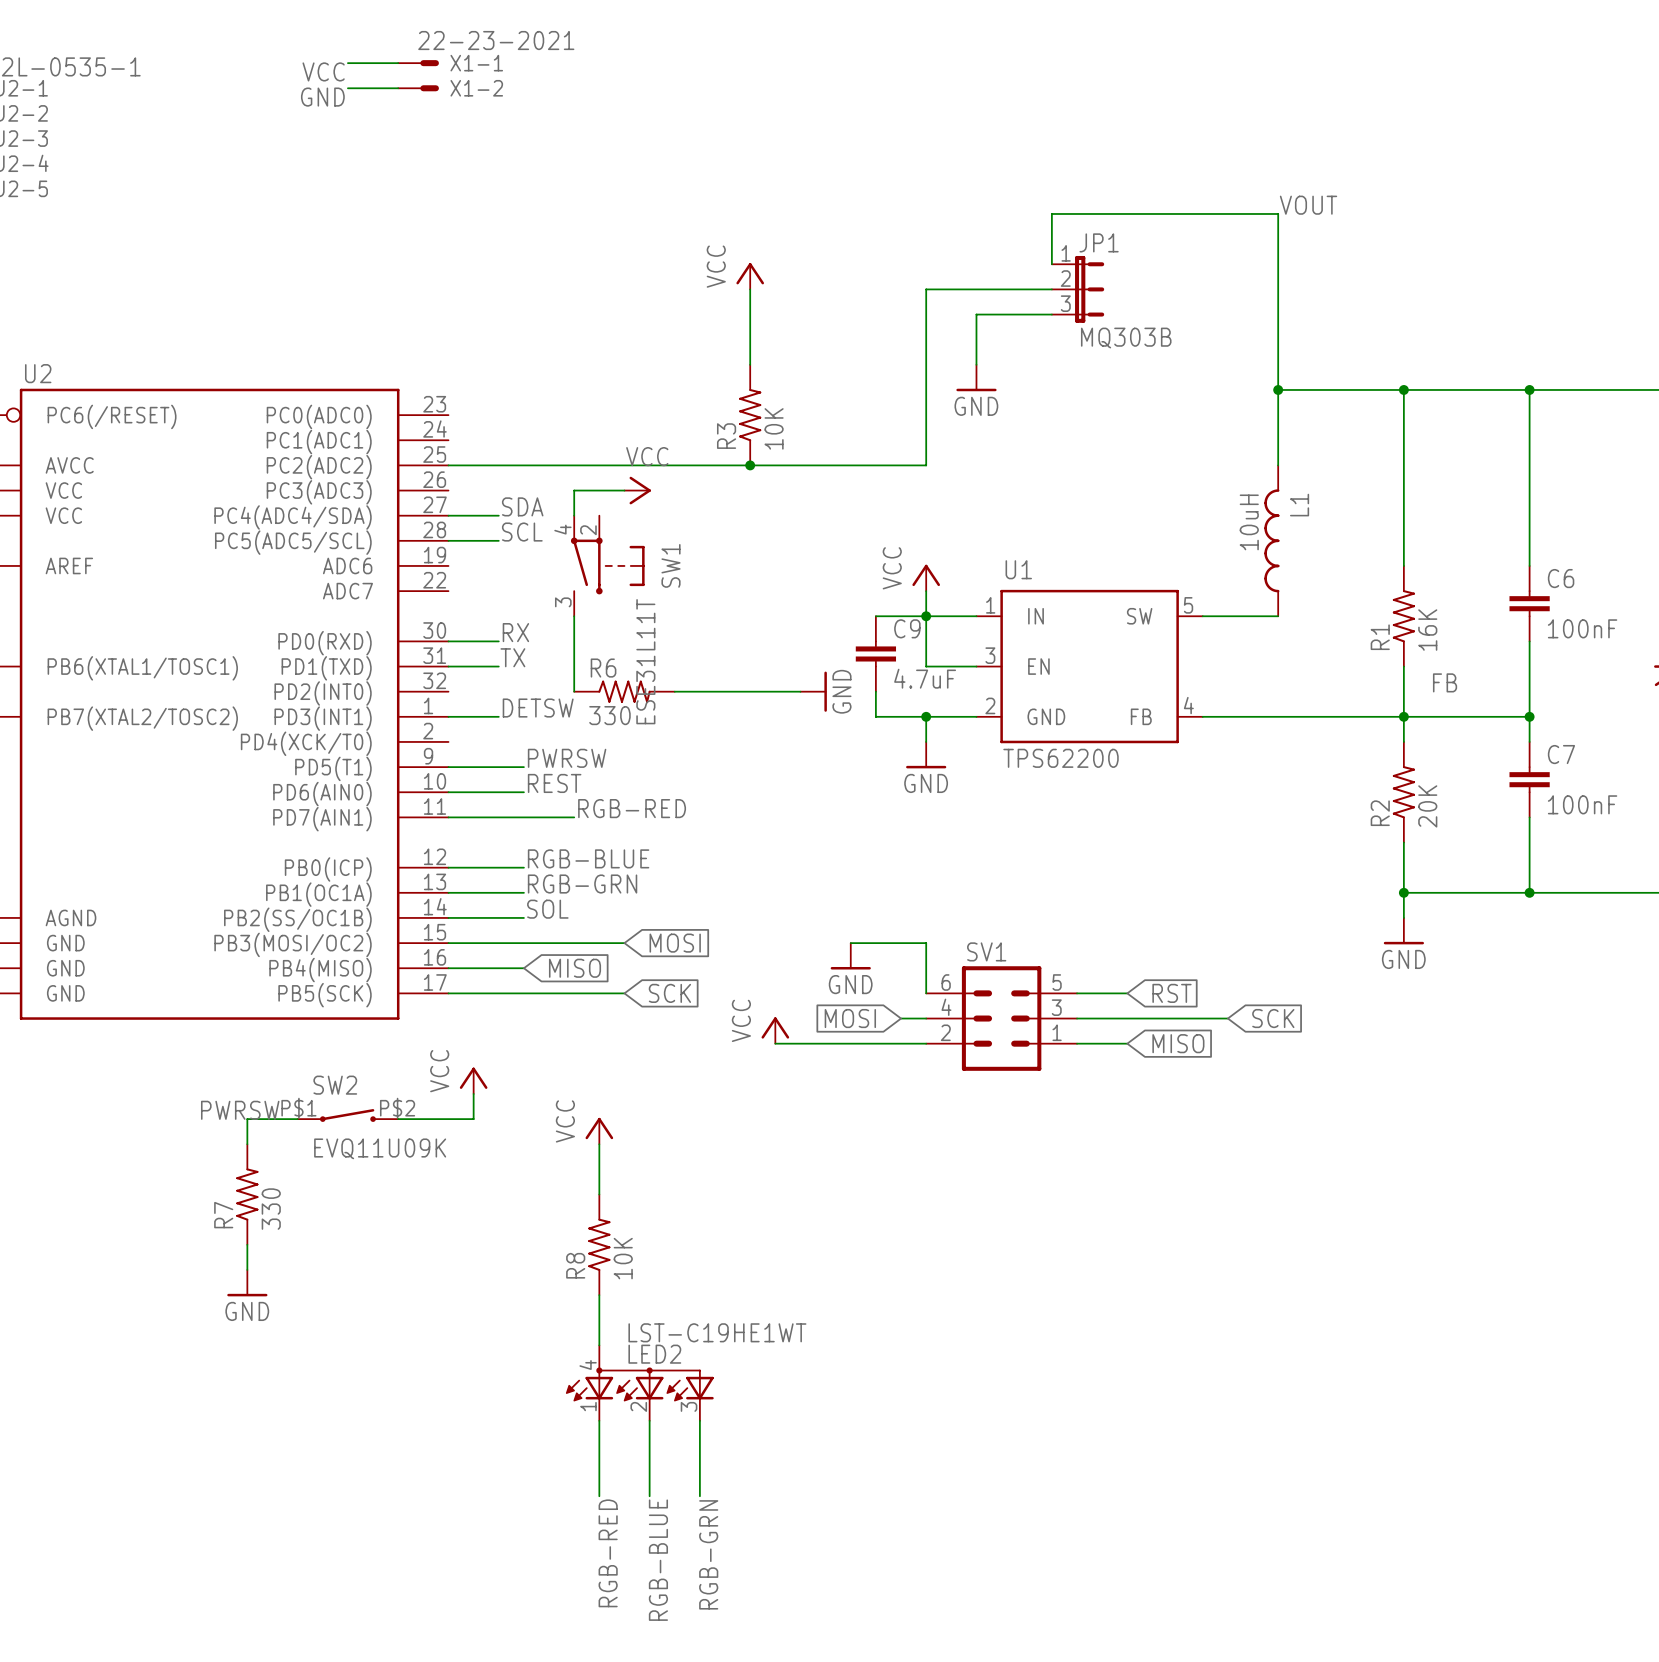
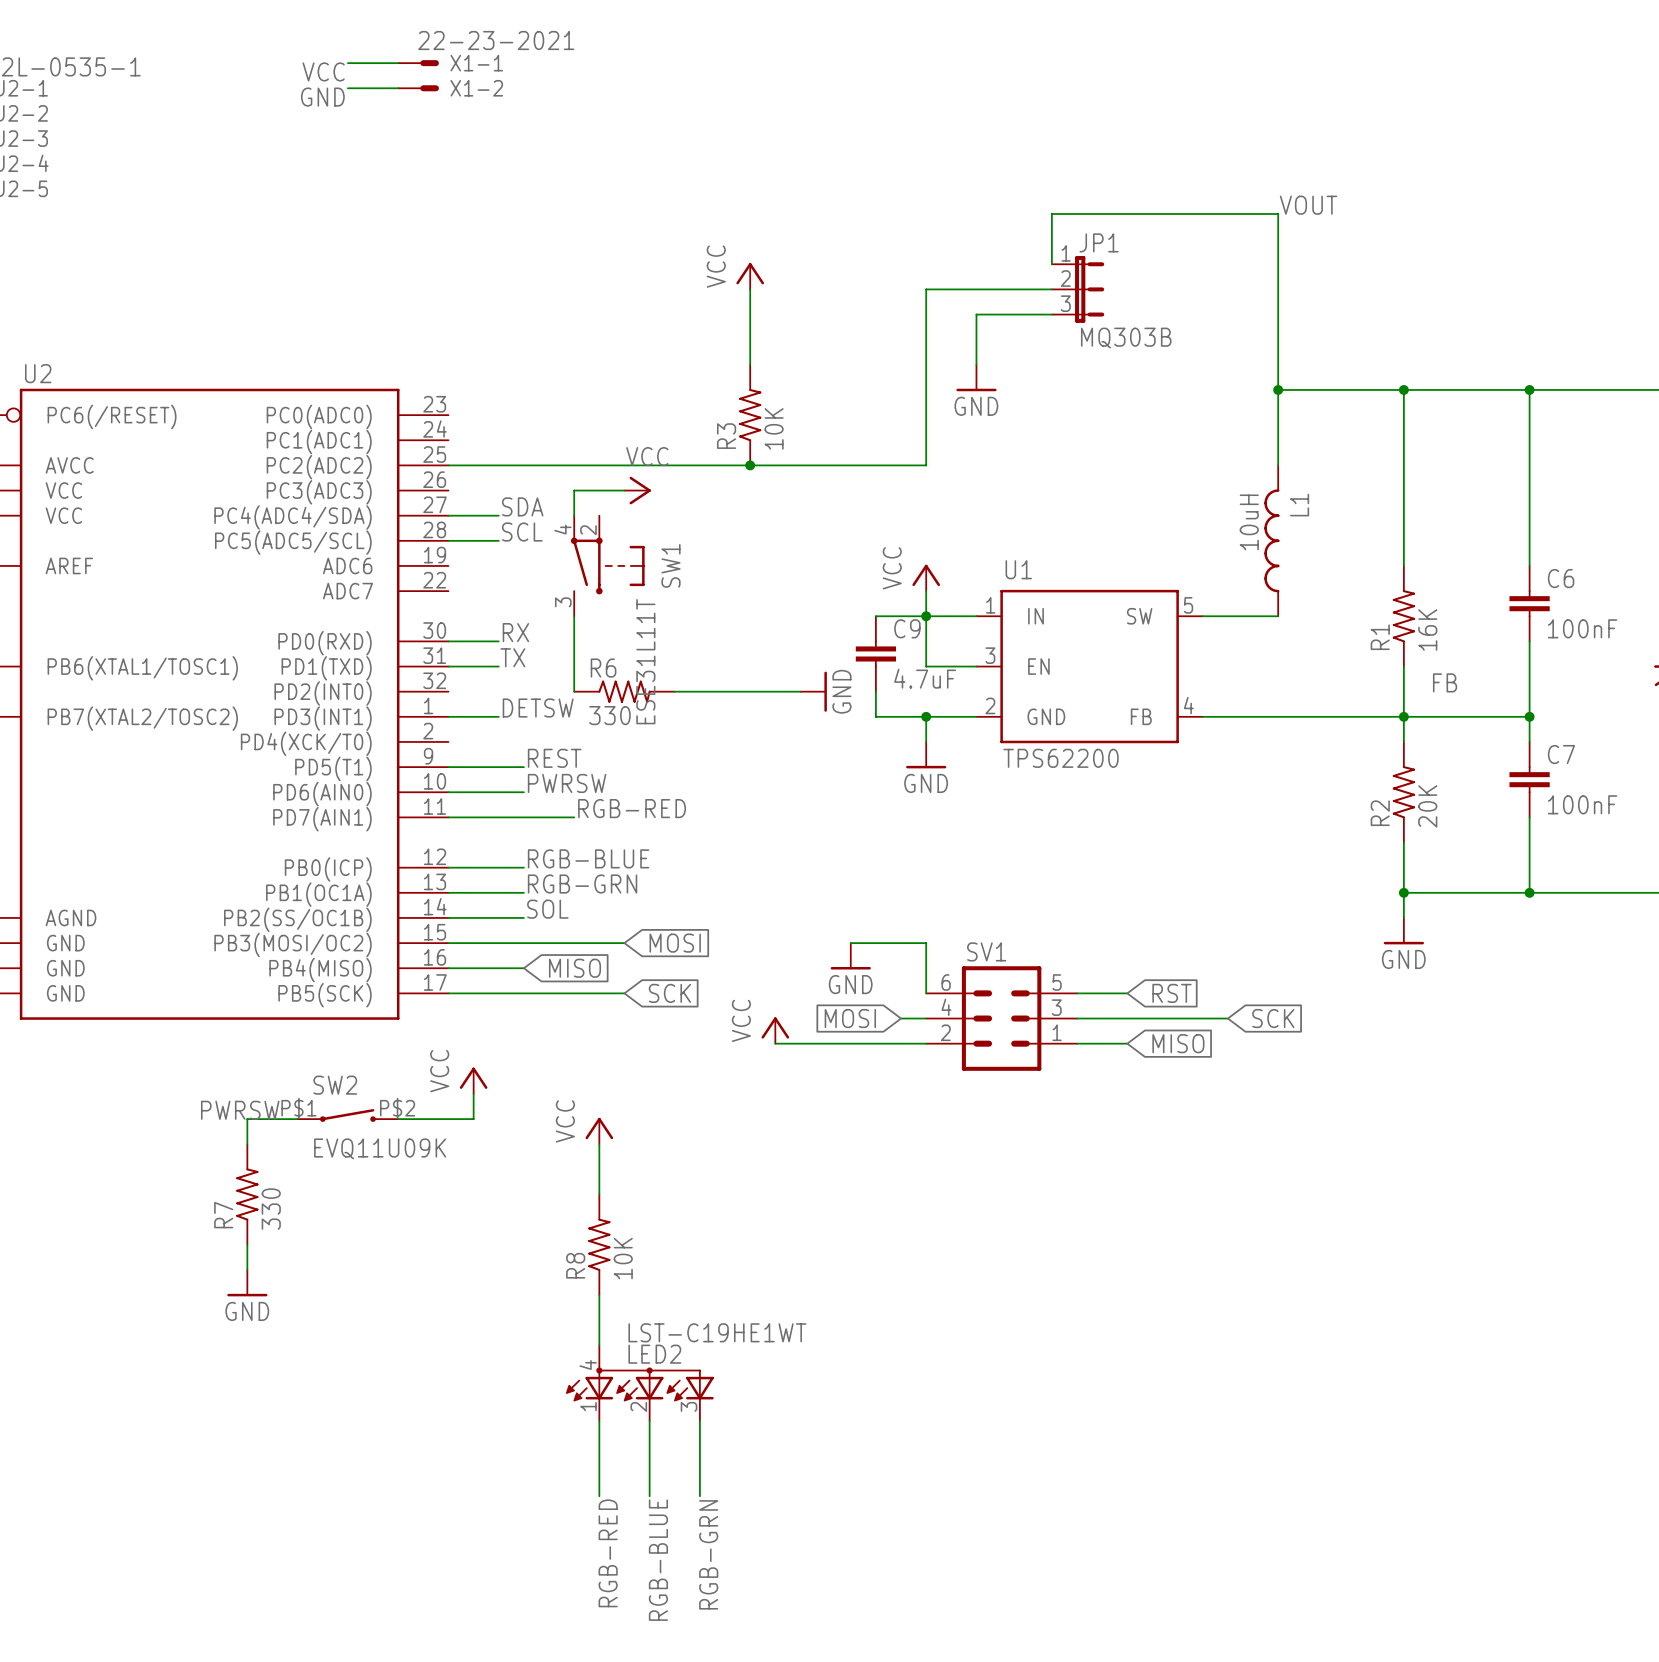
label: PWRSW (567, 758) -> REST (554, 758)
label: REST (554, 783) -> PWRSW (567, 783)

